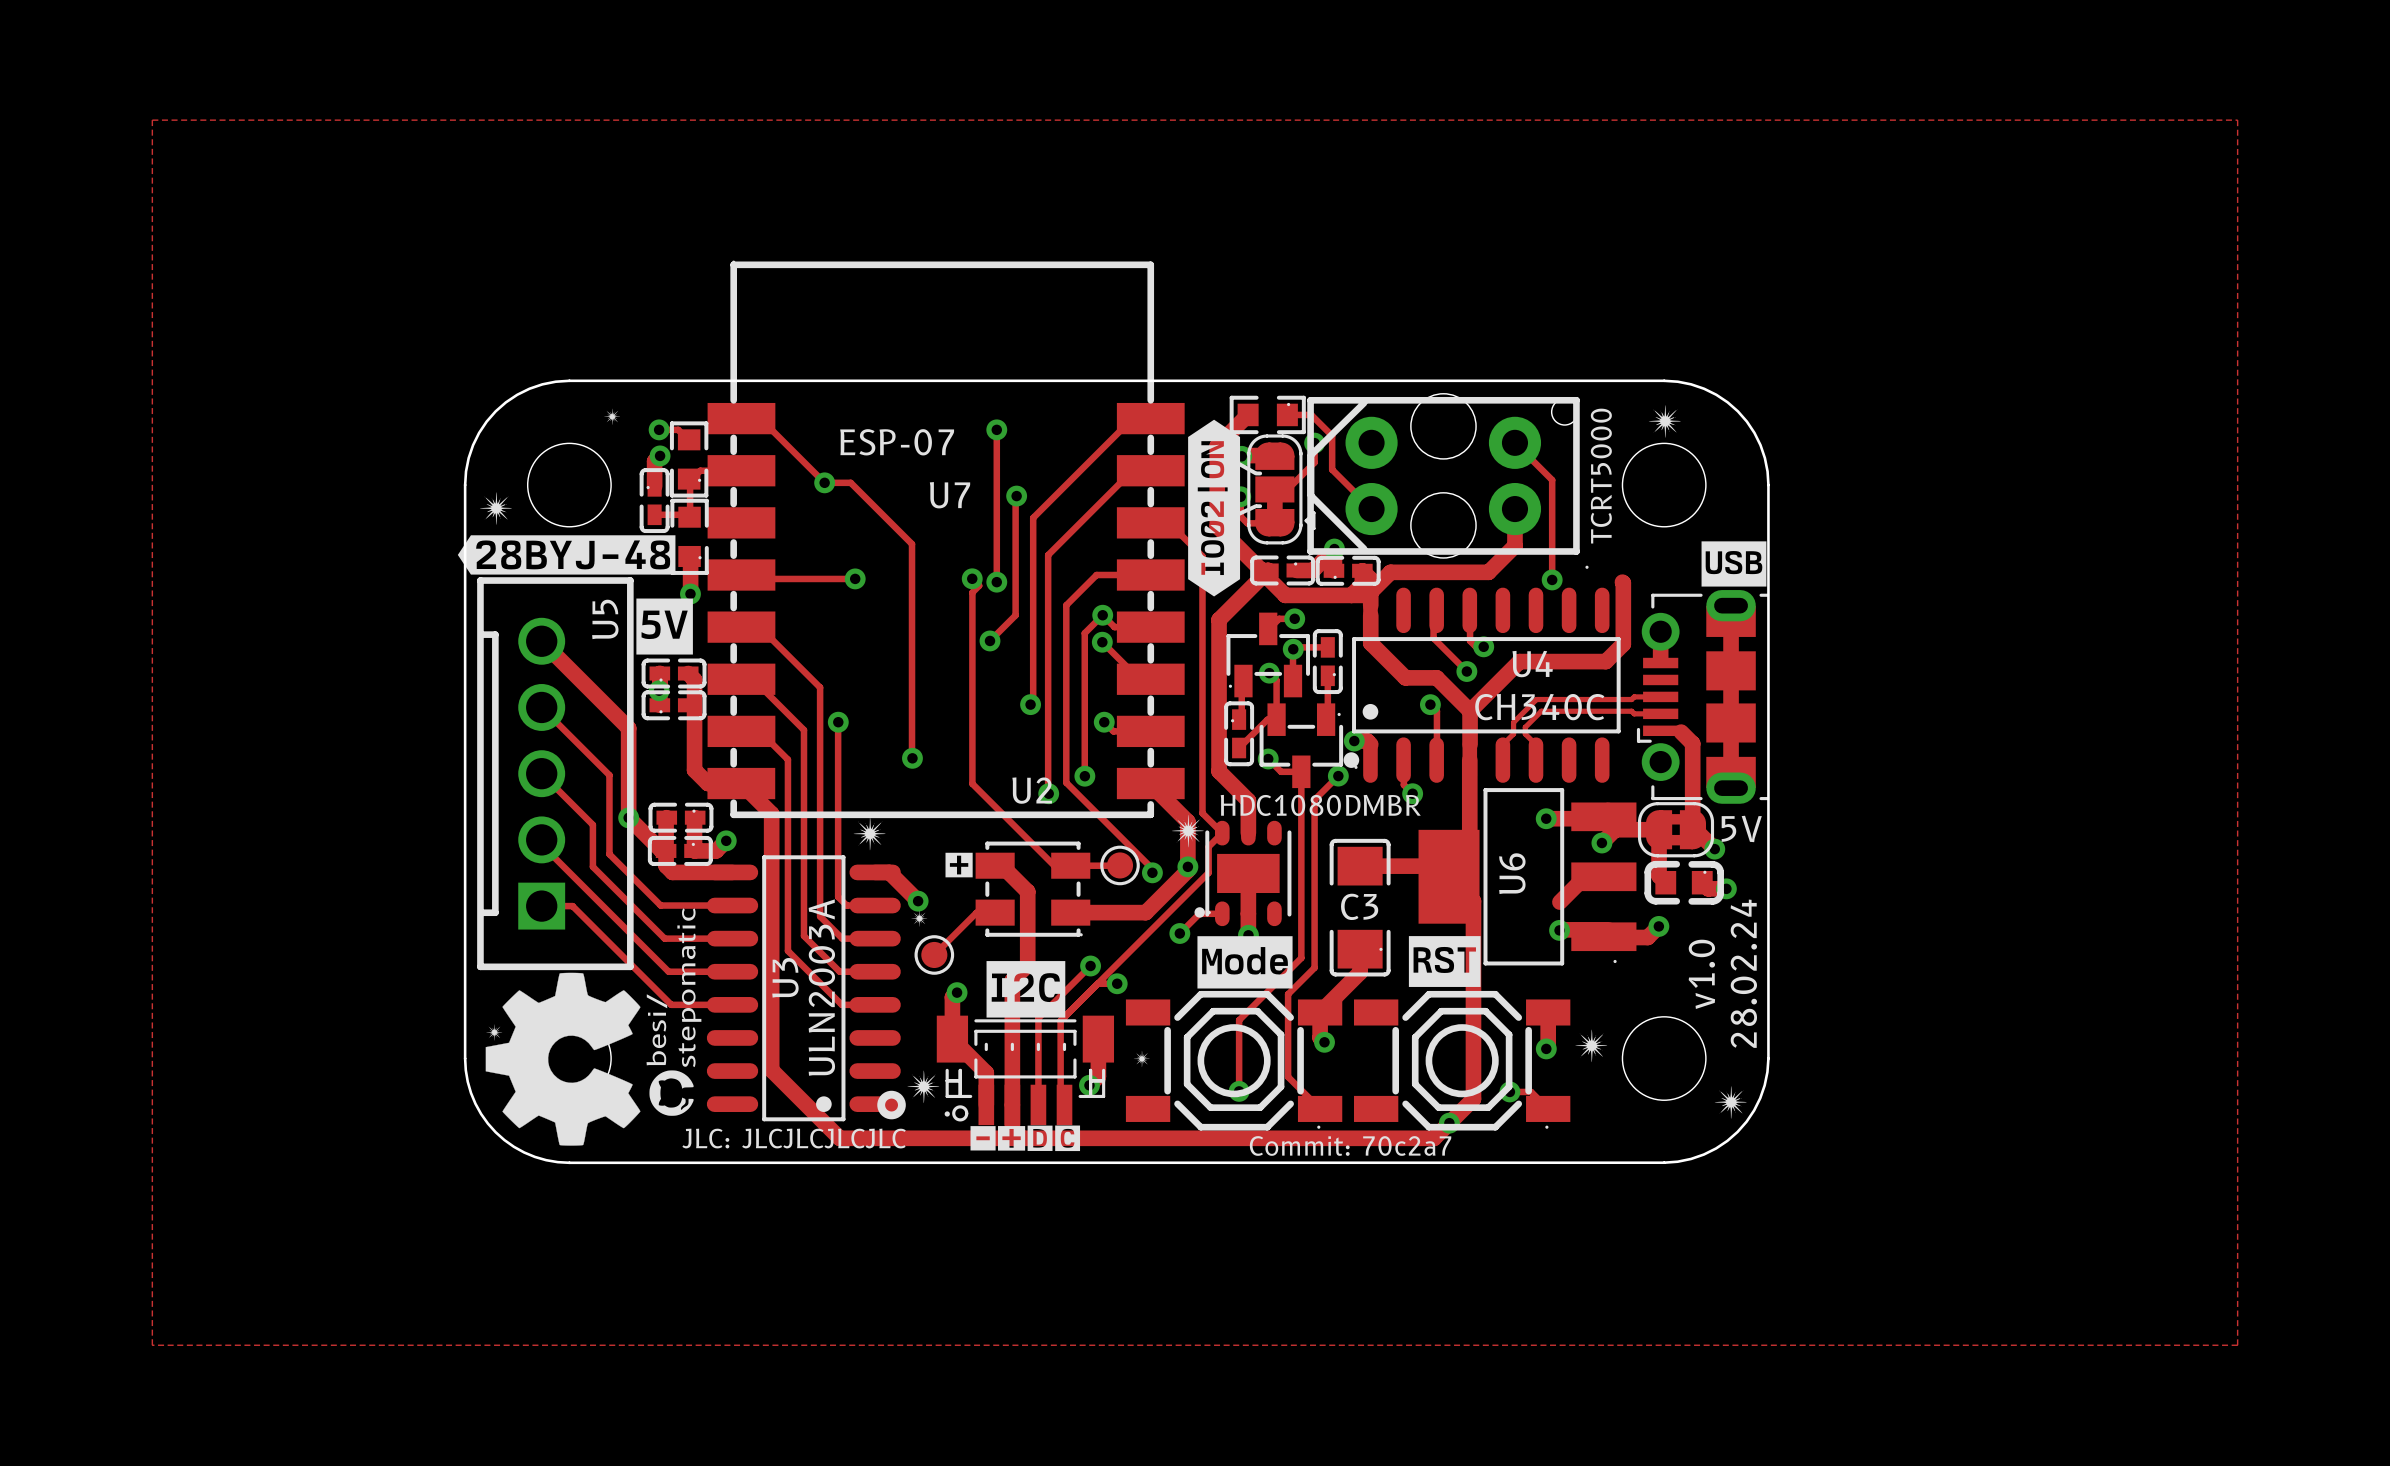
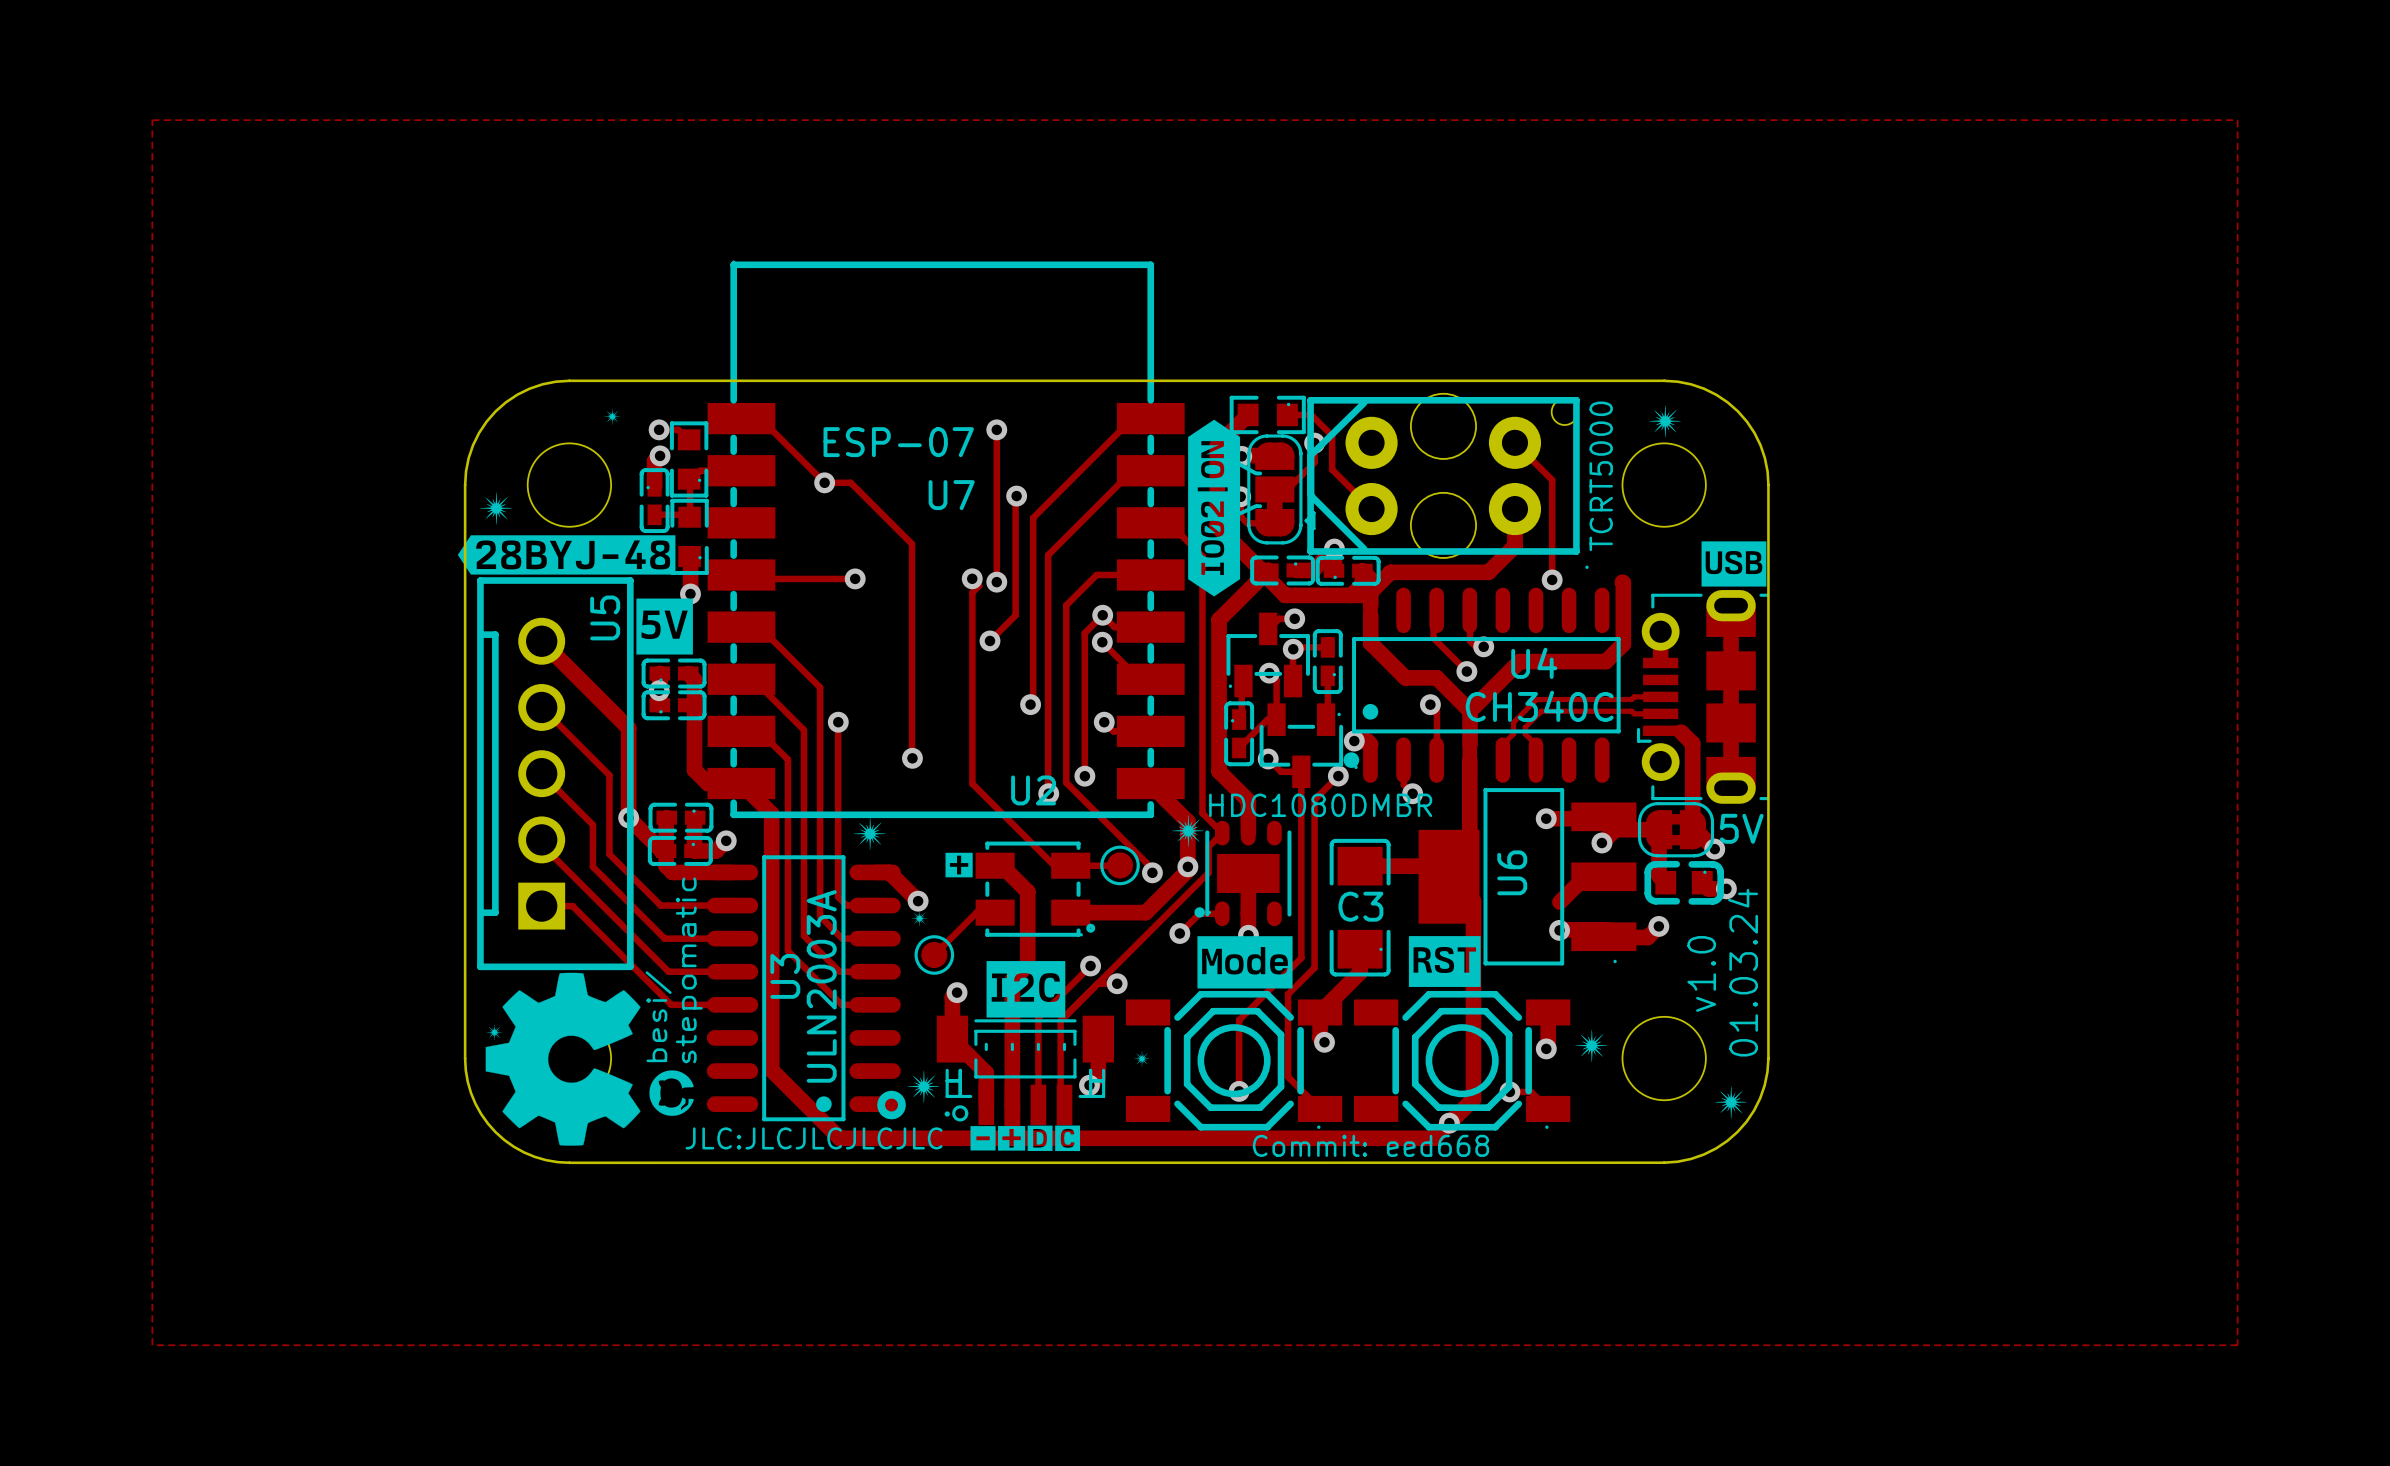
drawing: none -> [1086, 923, 1096, 933]
text: 28.02.24 (1743, 973) -> 01.03.24 (1743, 972)
text: Commit: 70c2a7 (1350, 1145) -> Commit: eed668 (1370, 1145)

